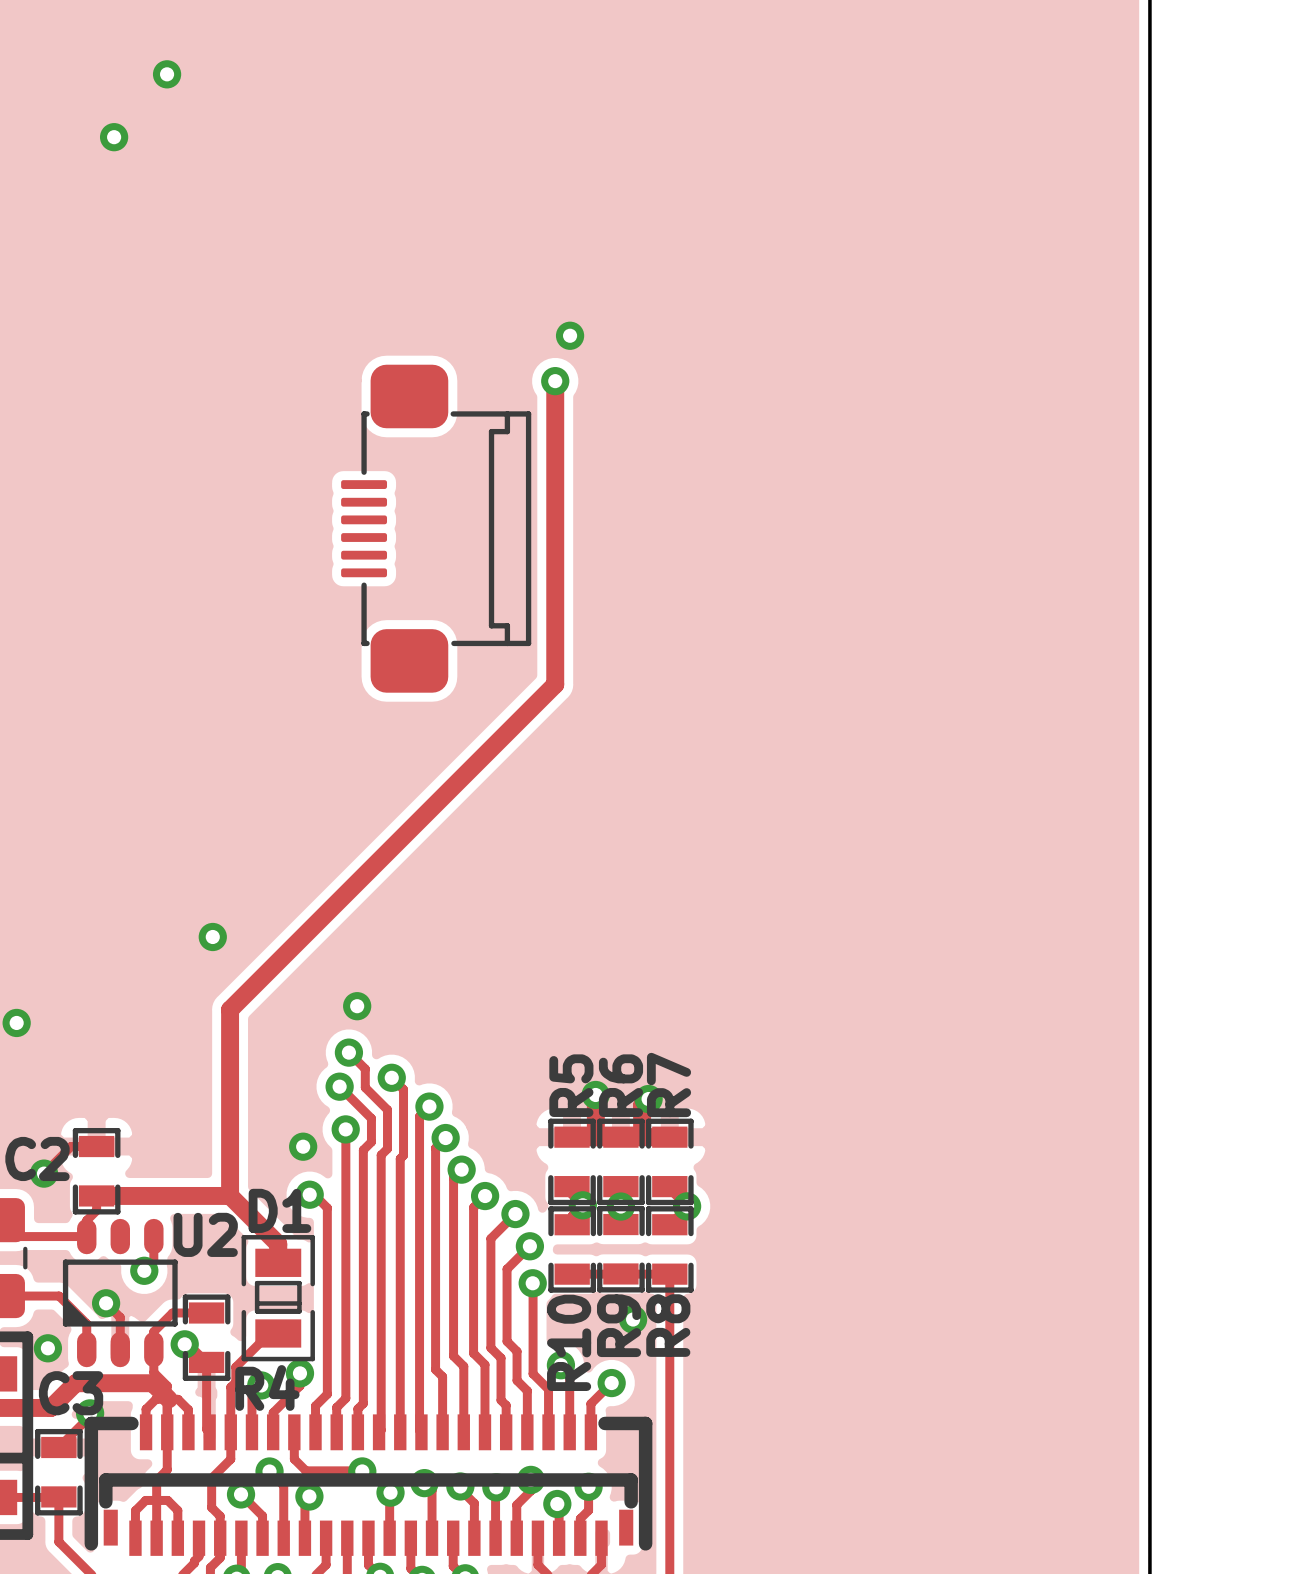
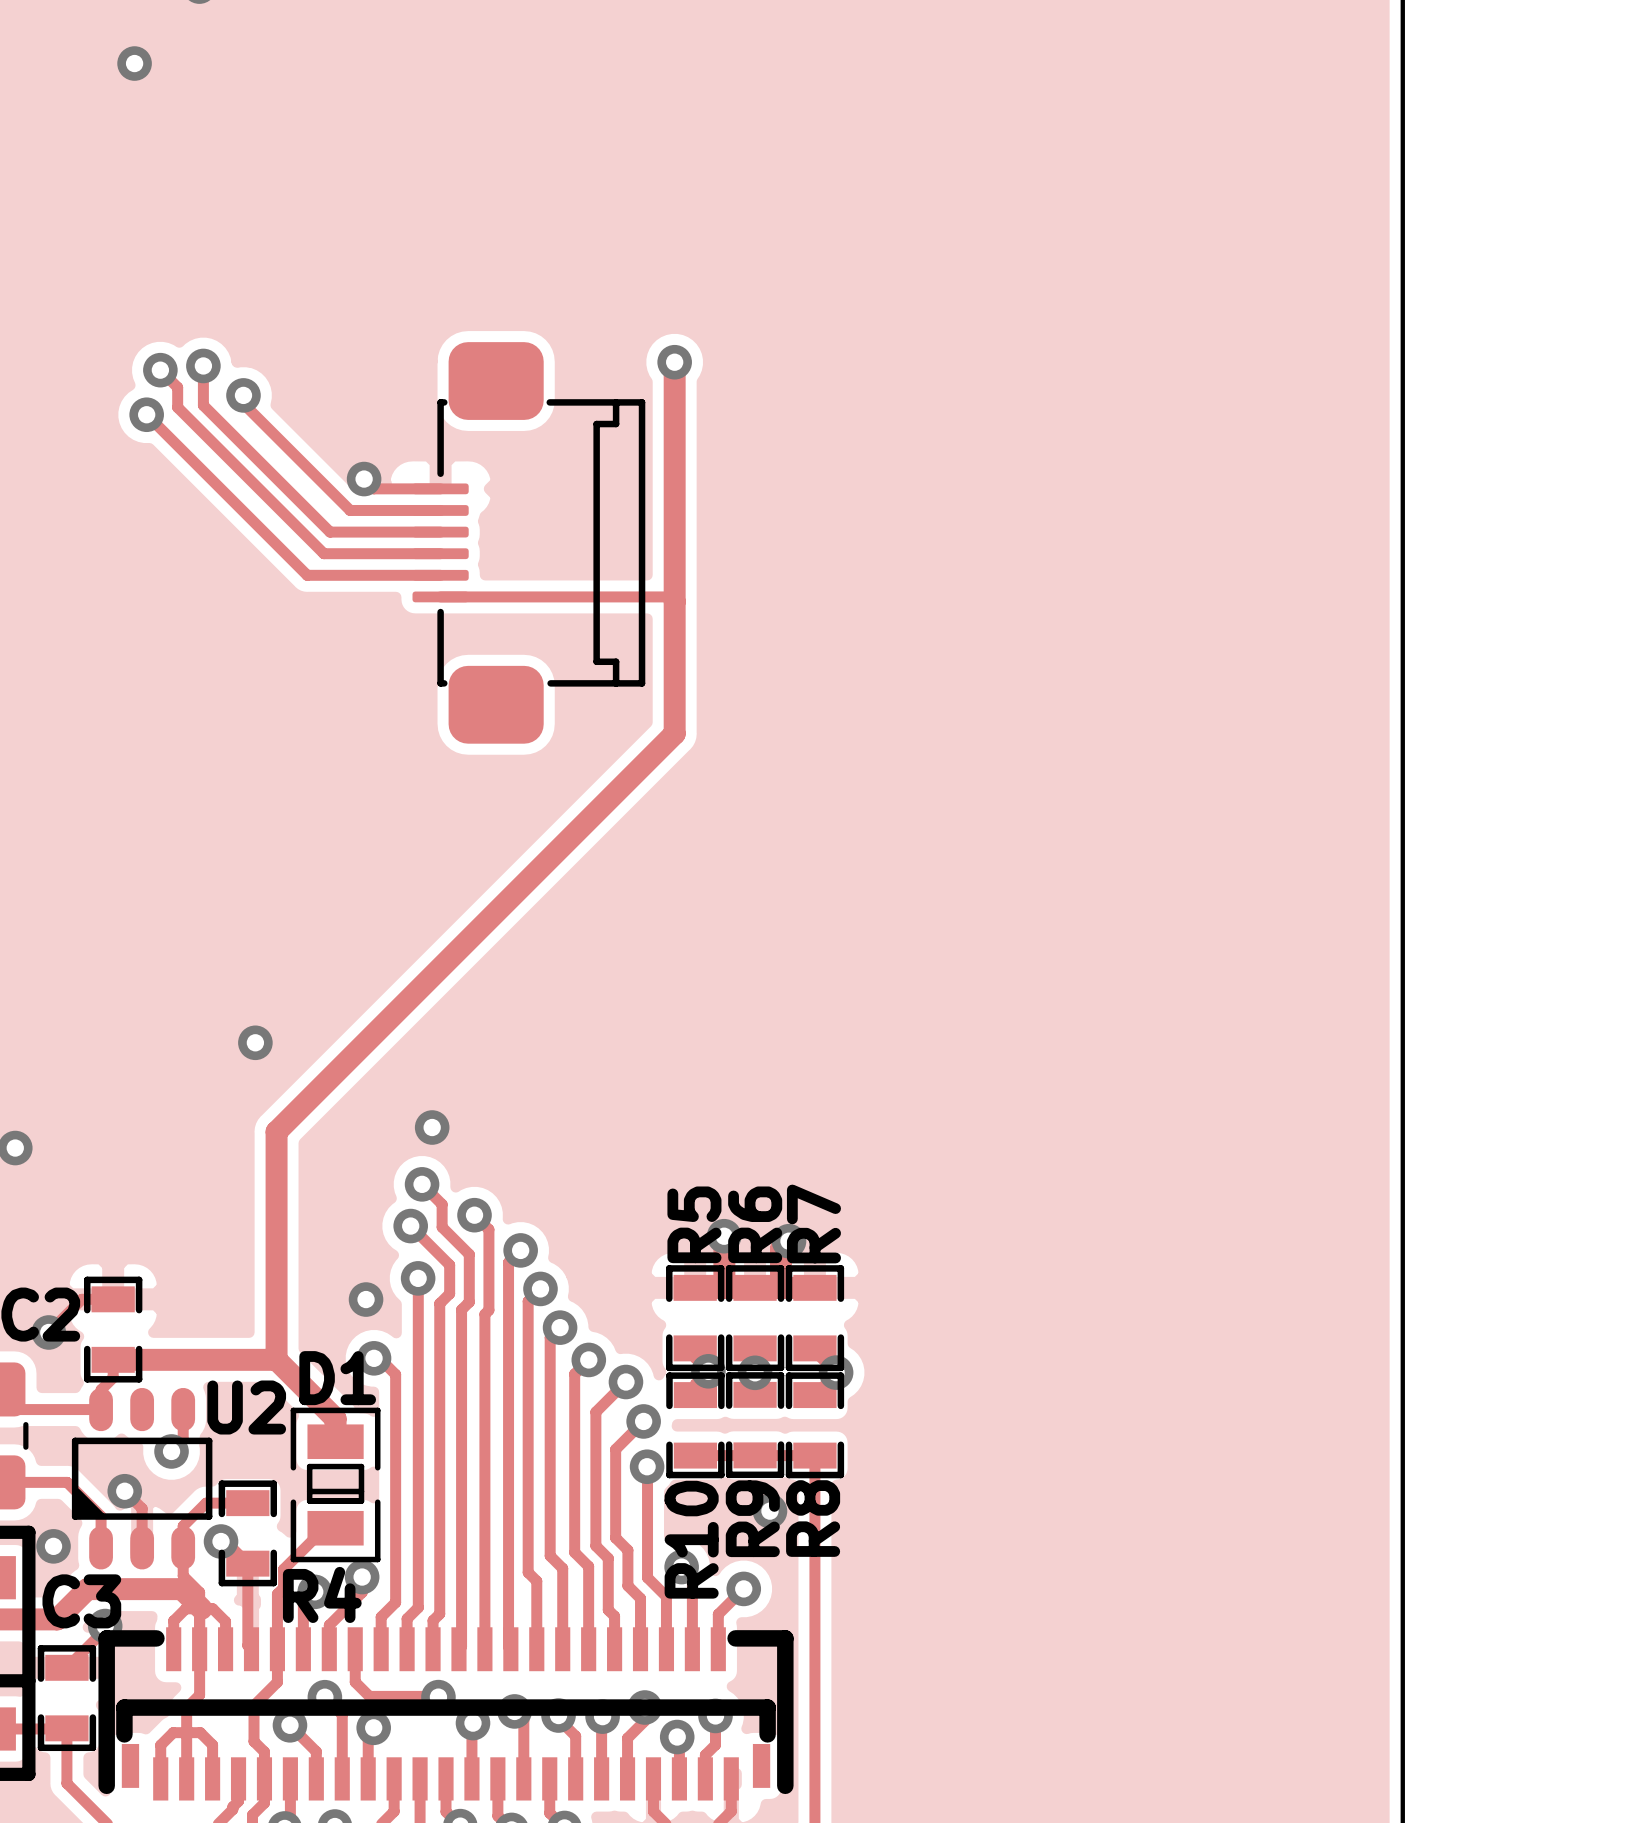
via: (570, 335) -> none
track: none -> (203, 365) (203, 405) (330, 532) (440, 532)
via: none -> (203, 365)
track: none -> (160, 370) (177, 387) (177, 407) (323, 553) (440, 553)
via: none -> (160, 370)
track: none -> (243, 395) (243, 403) (350, 510) (440, 510)
via: none -> (243, 395)
track: none -> (146, 414) (307, 575) (440, 575)
via: none -> (146, 414)
track: none -> (364, 479) (373, 488) (440, 488)
via: none -> (364, 479)
track: none -> (440, 596) (669, 596) (674, 601)

